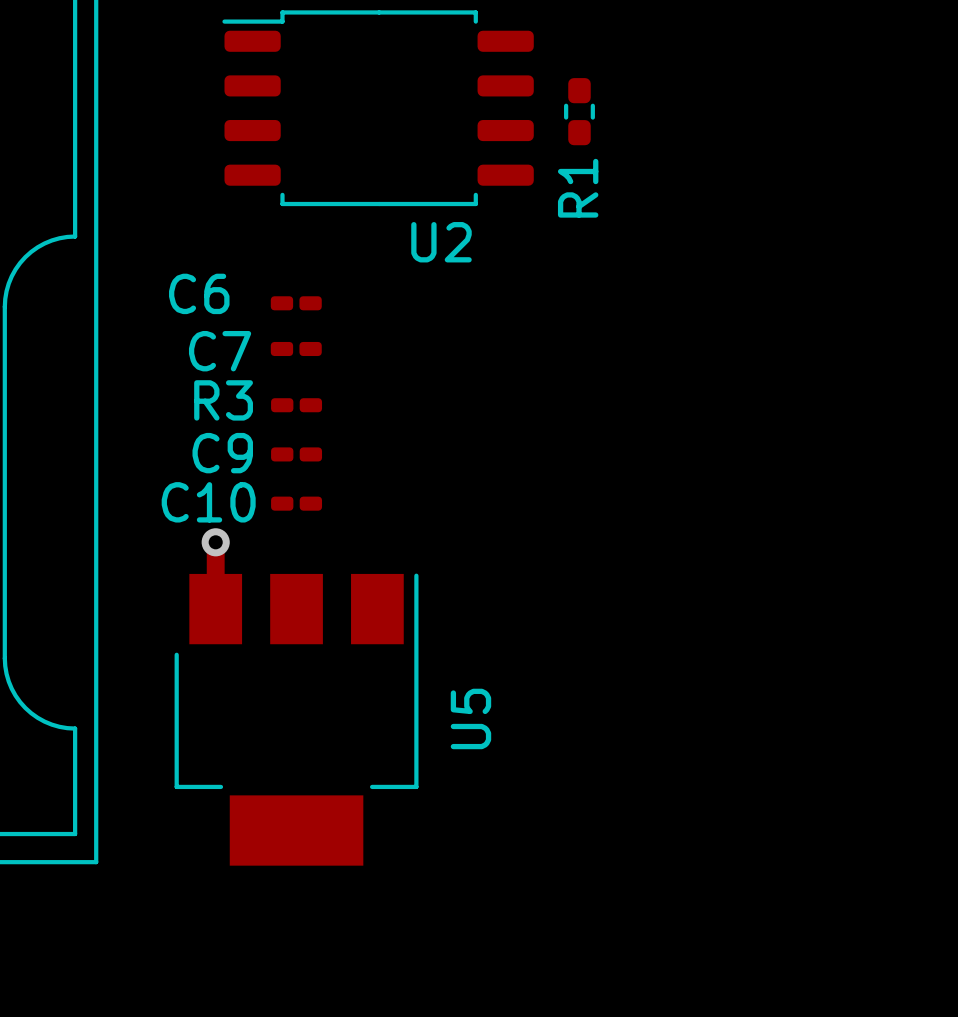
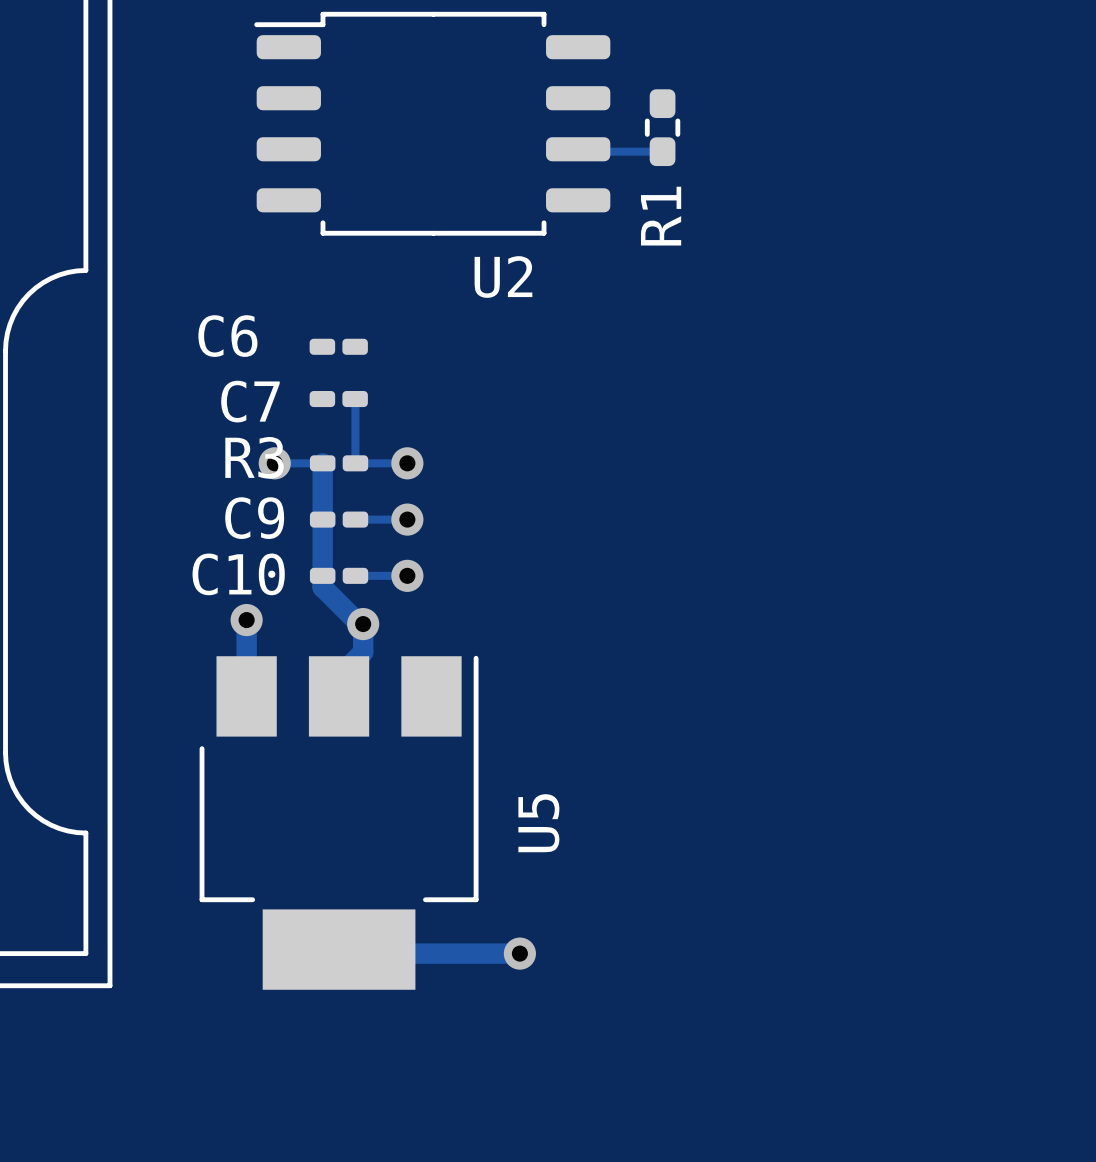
track: none -> (578, 149) (580, 151) (662, 151)
track: none -> (355, 399) (355, 463) (407, 463)
track: none -> (274, 463) (322, 463) (322, 587) (359, 624) (363, 624) (363, 652) (339, 676) (339, 696)
via: none -> (274, 463)
via: none -> (407, 463)
track: none -> (355, 519) (407, 519)
via: none -> (407, 519)
track: none -> (355, 575) (407, 575)
via: none -> (407, 575)
via: none -> (363, 624)
track: none -> (339, 949) (343, 953) (519, 953)
via: none -> (519, 953)

